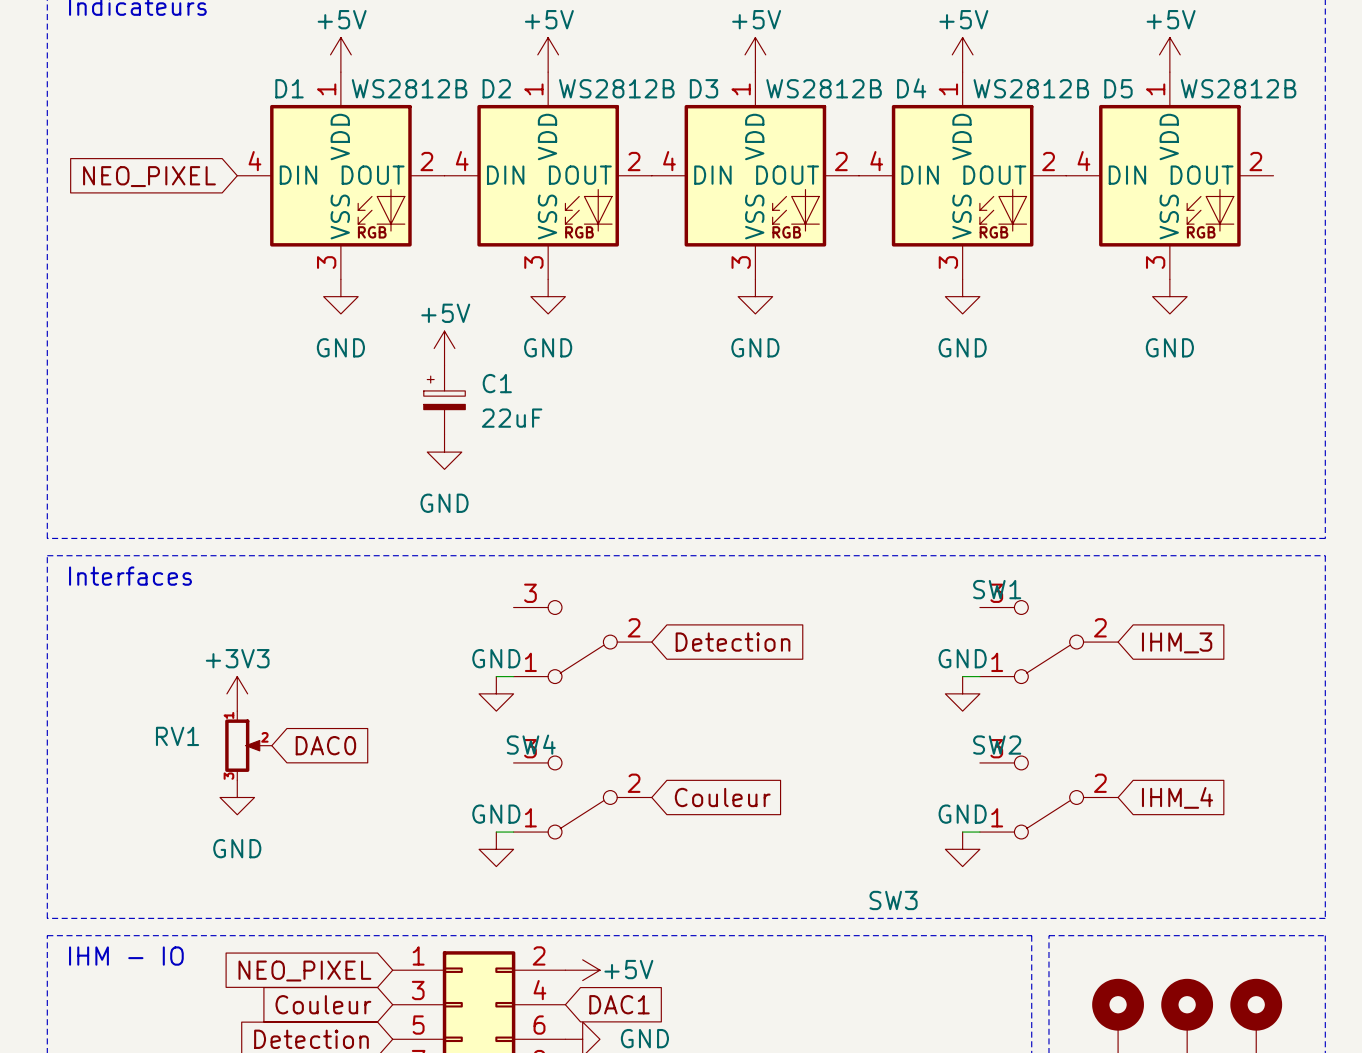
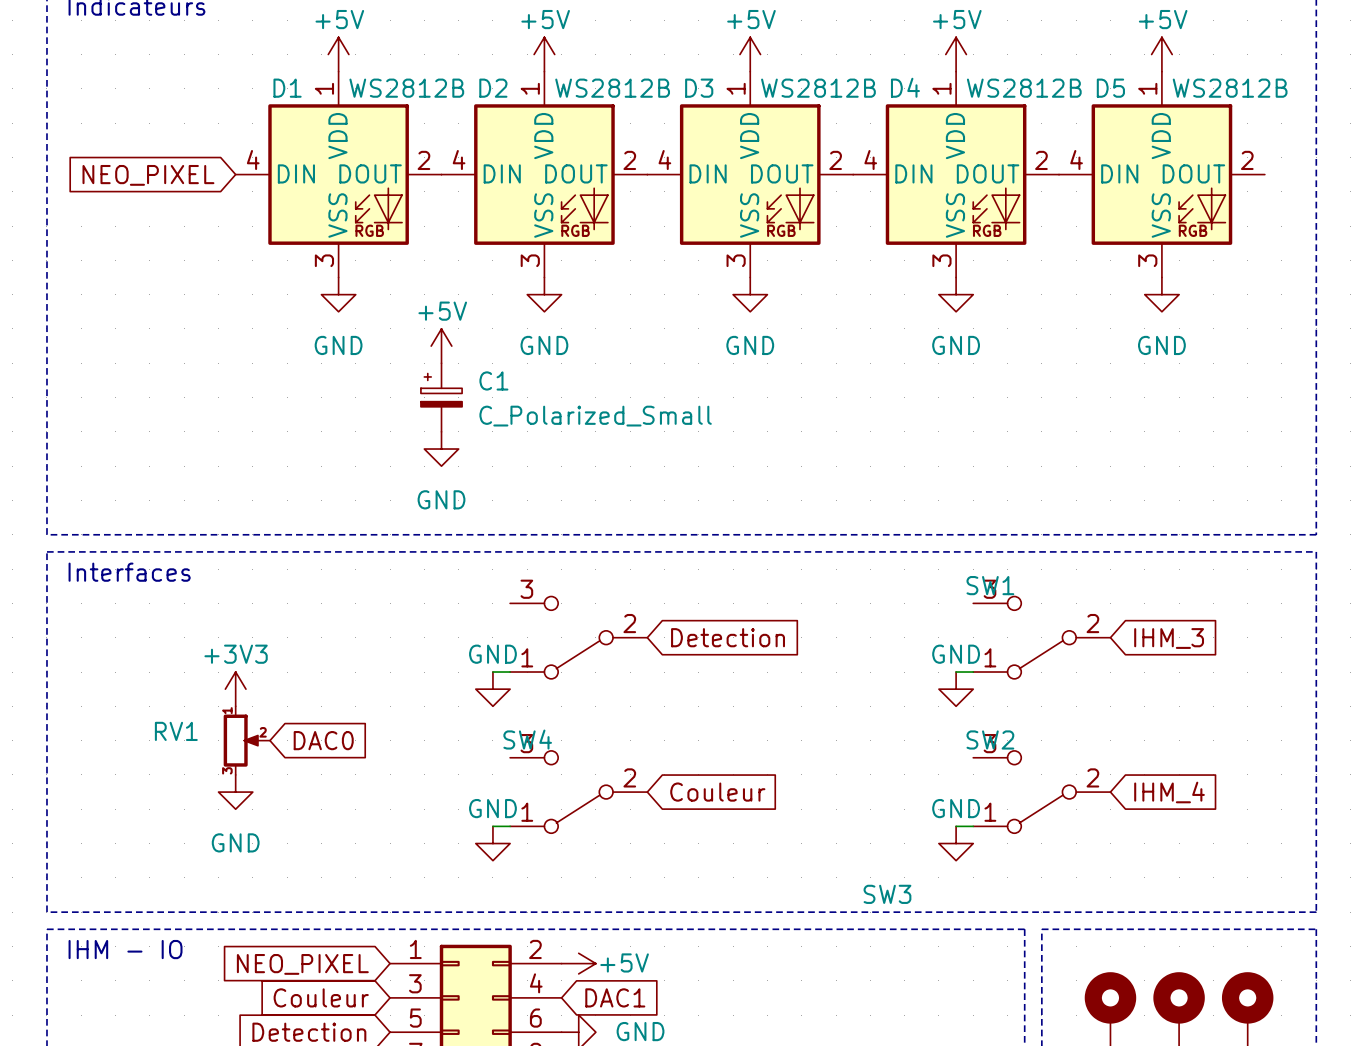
C1 value: 22uF (512, 418) -> C_Polarized_Small (595, 416)

